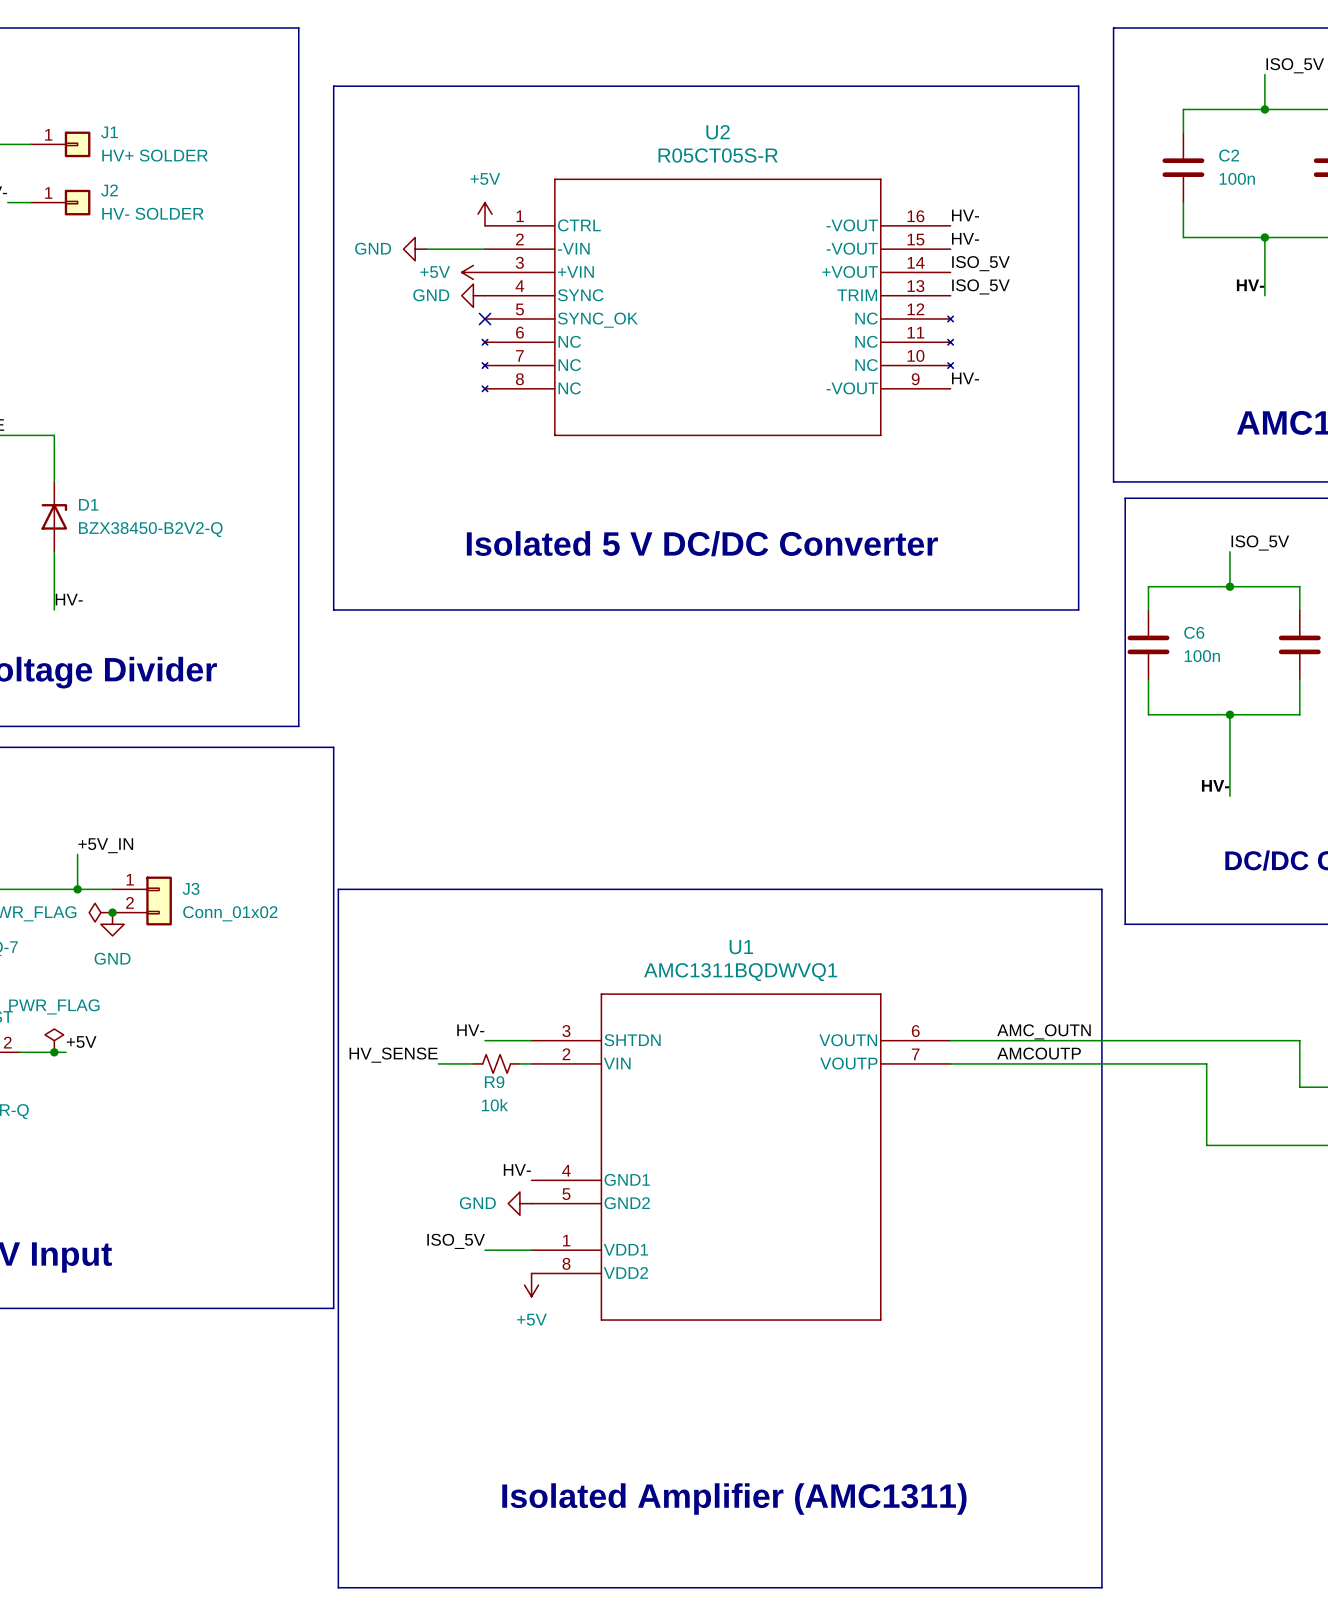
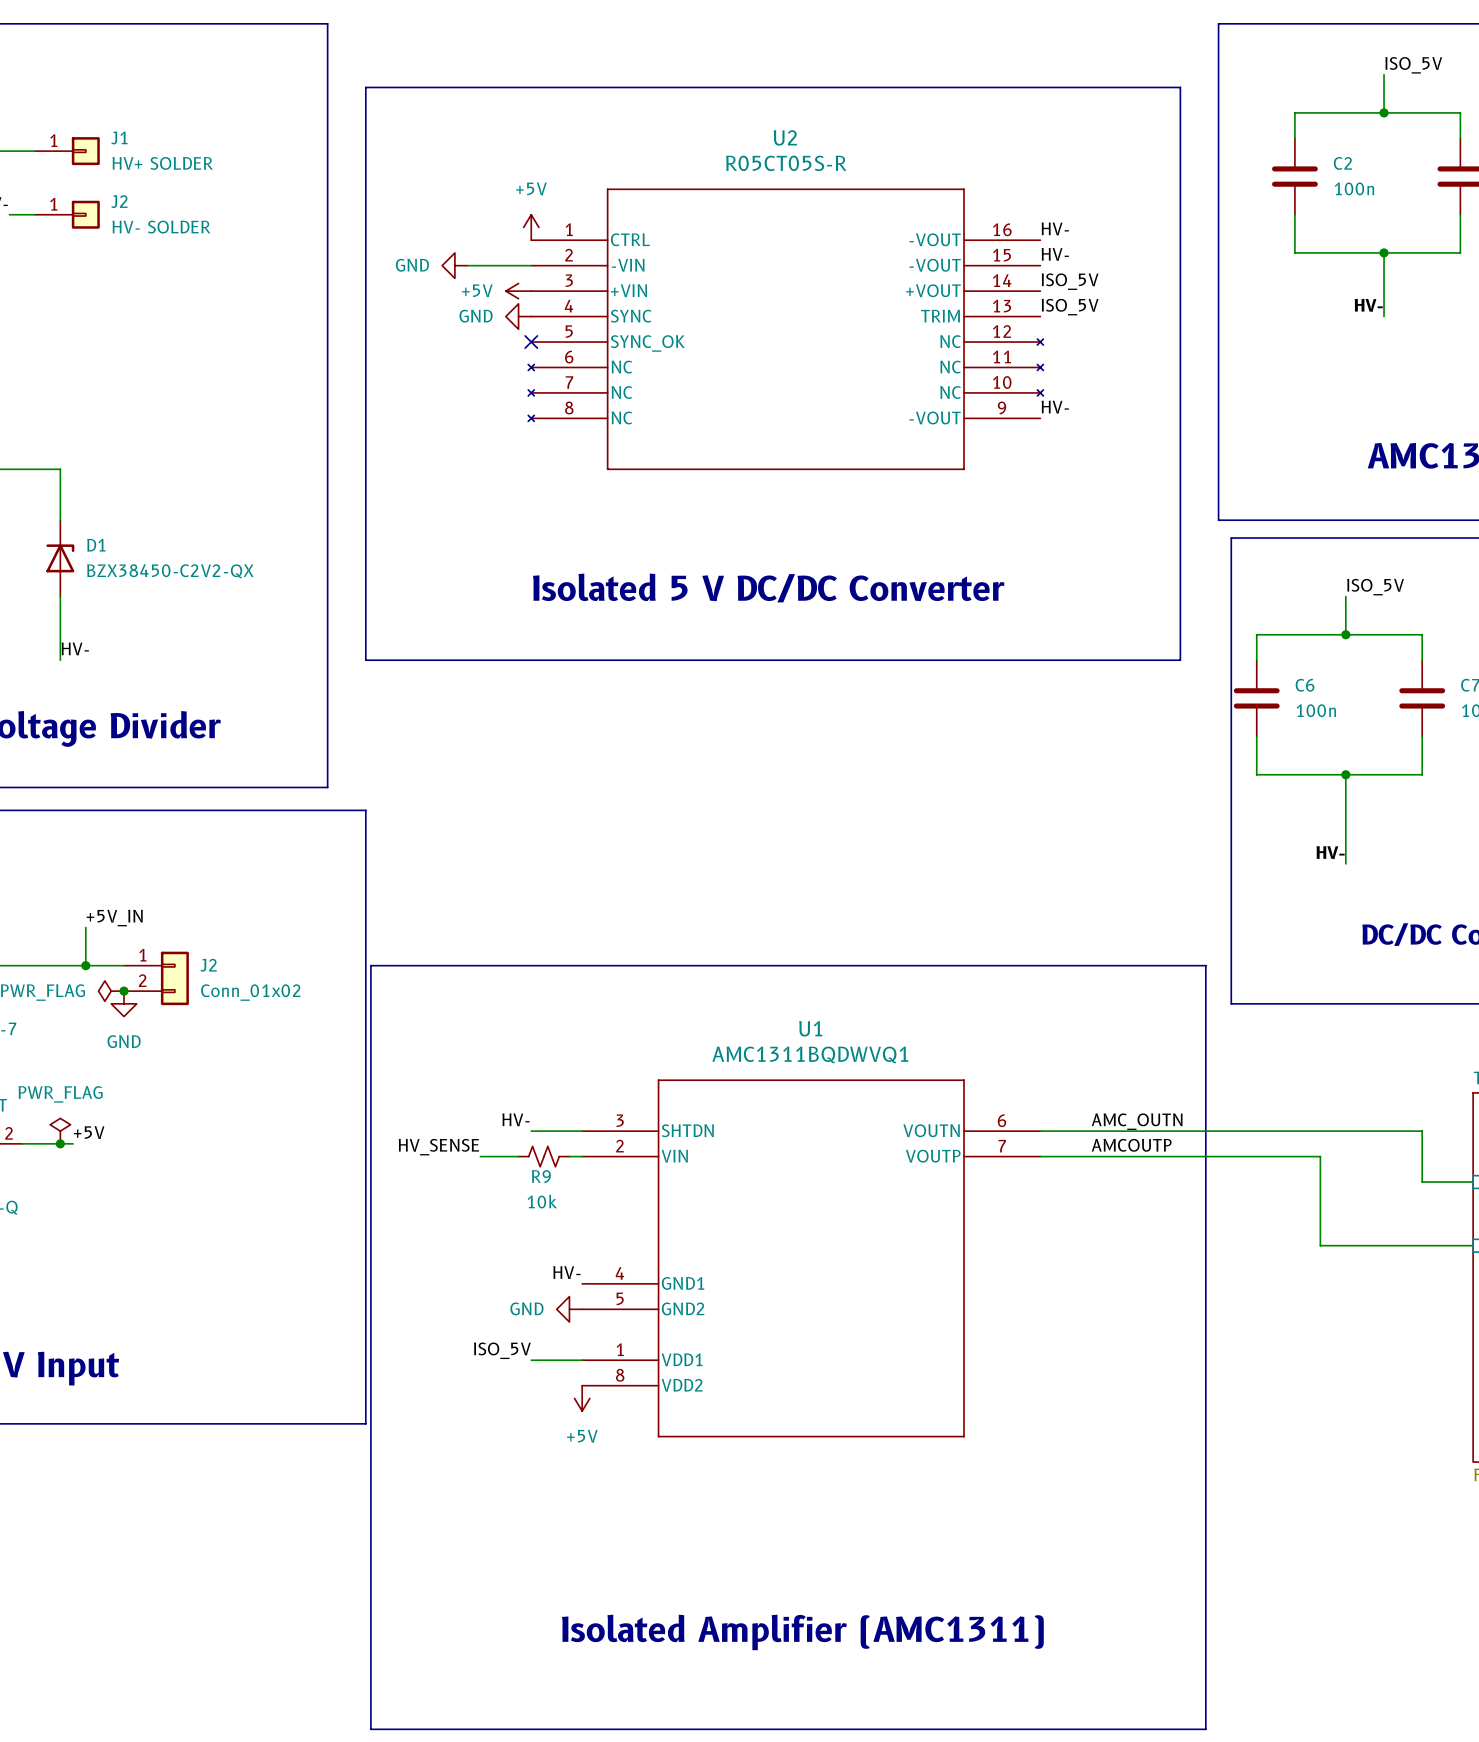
D1 value: BZX38450-B2V2-Q (150, 529) -> BZX38450-C2V2-QX (170, 571)
J3 name: J3 (191, 888) -> J2 (208, 965)

